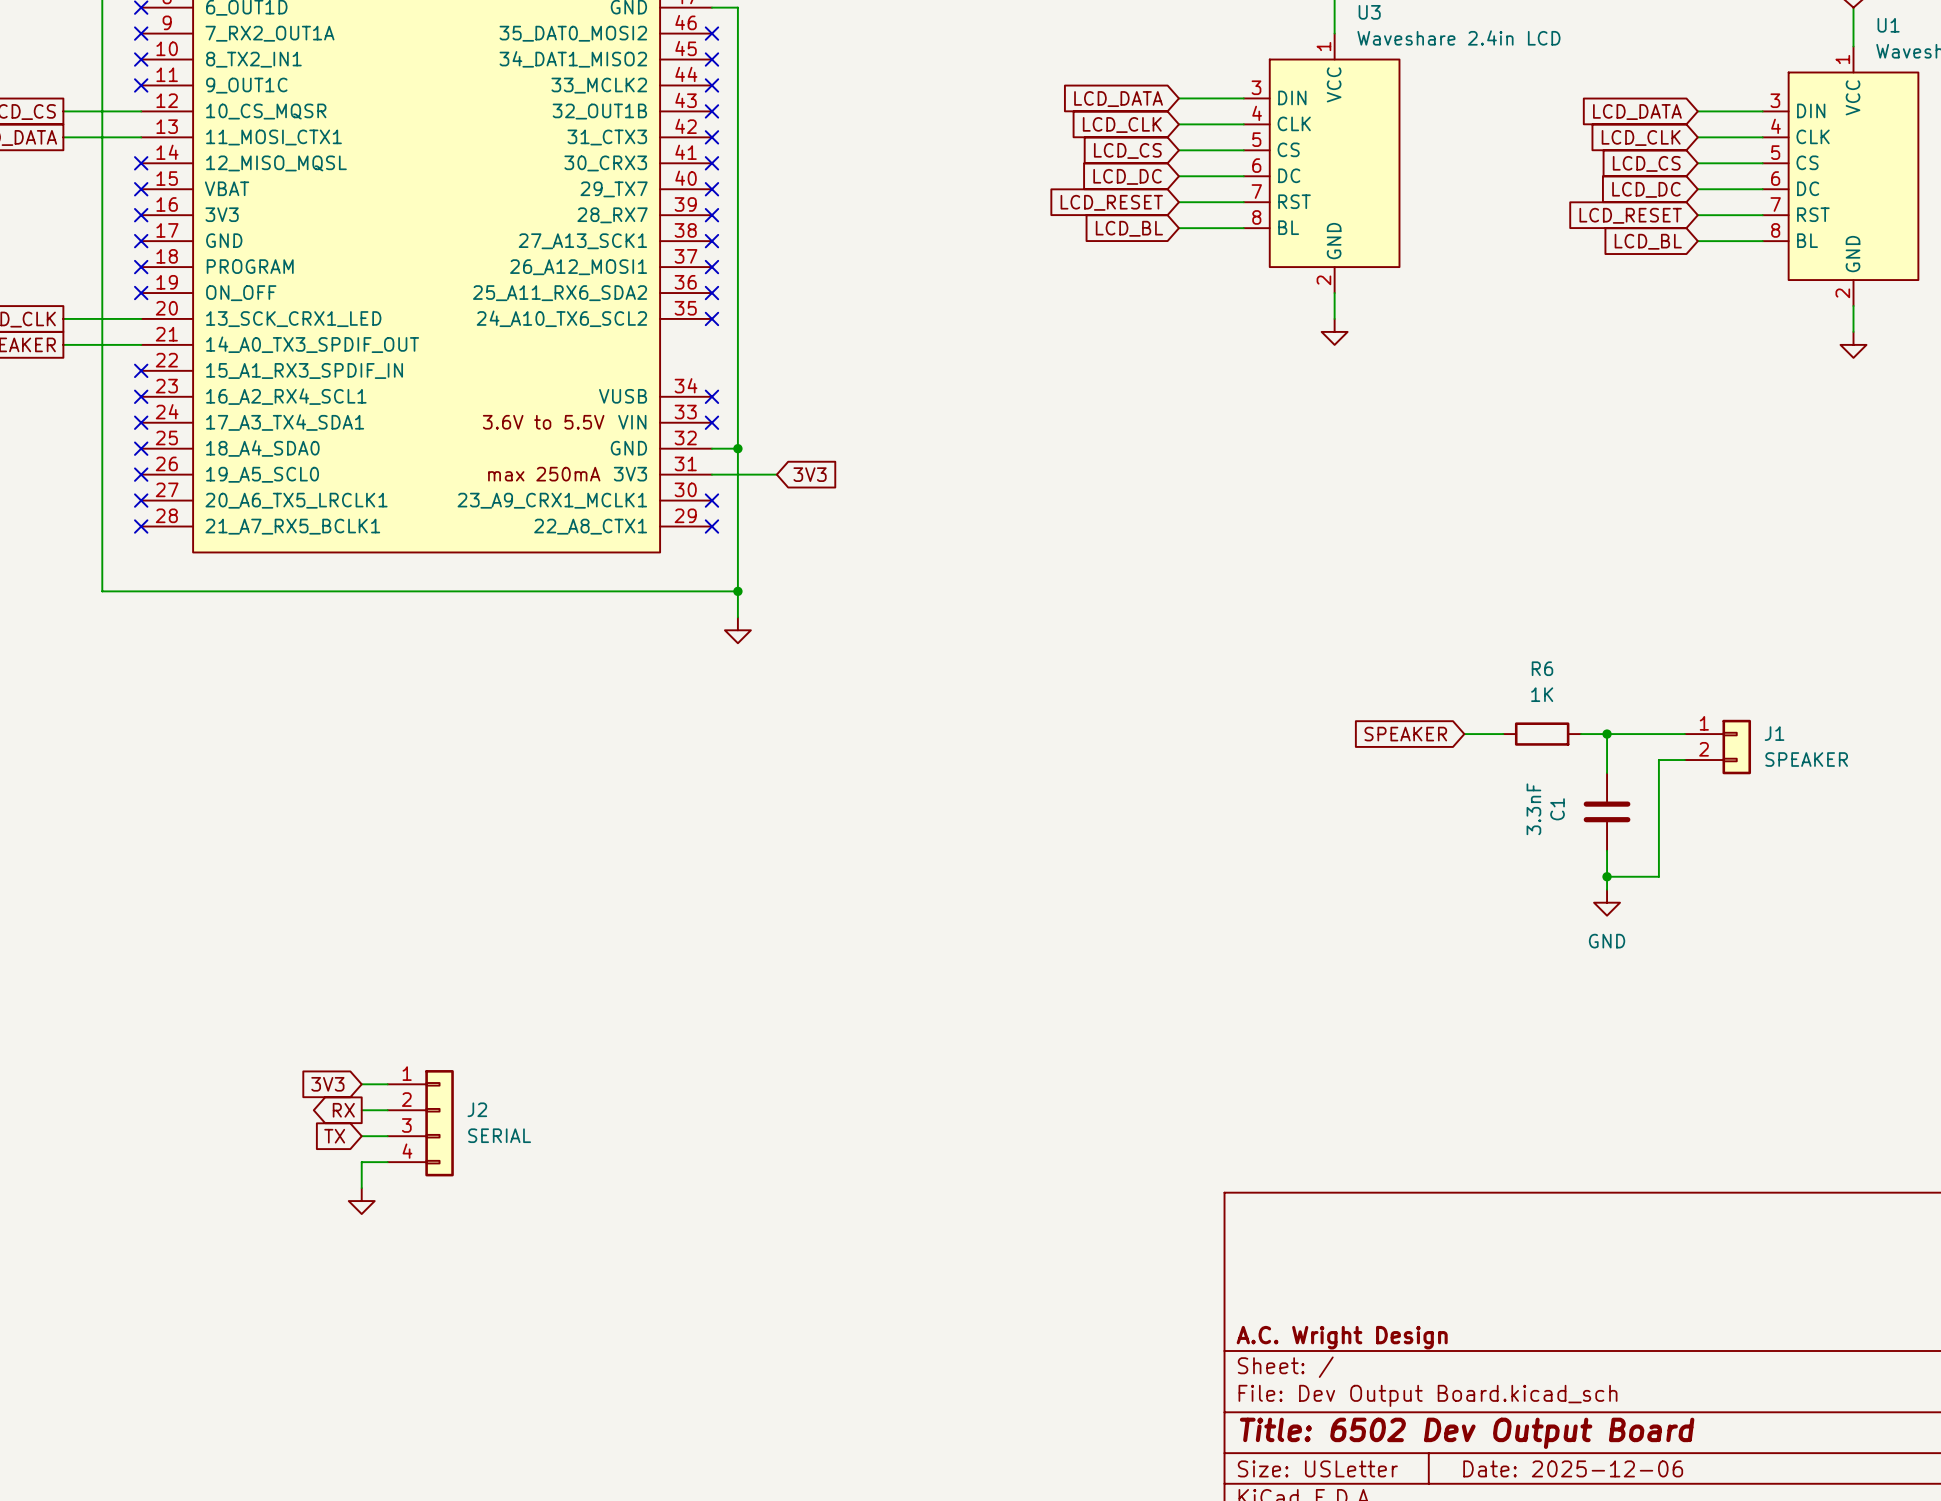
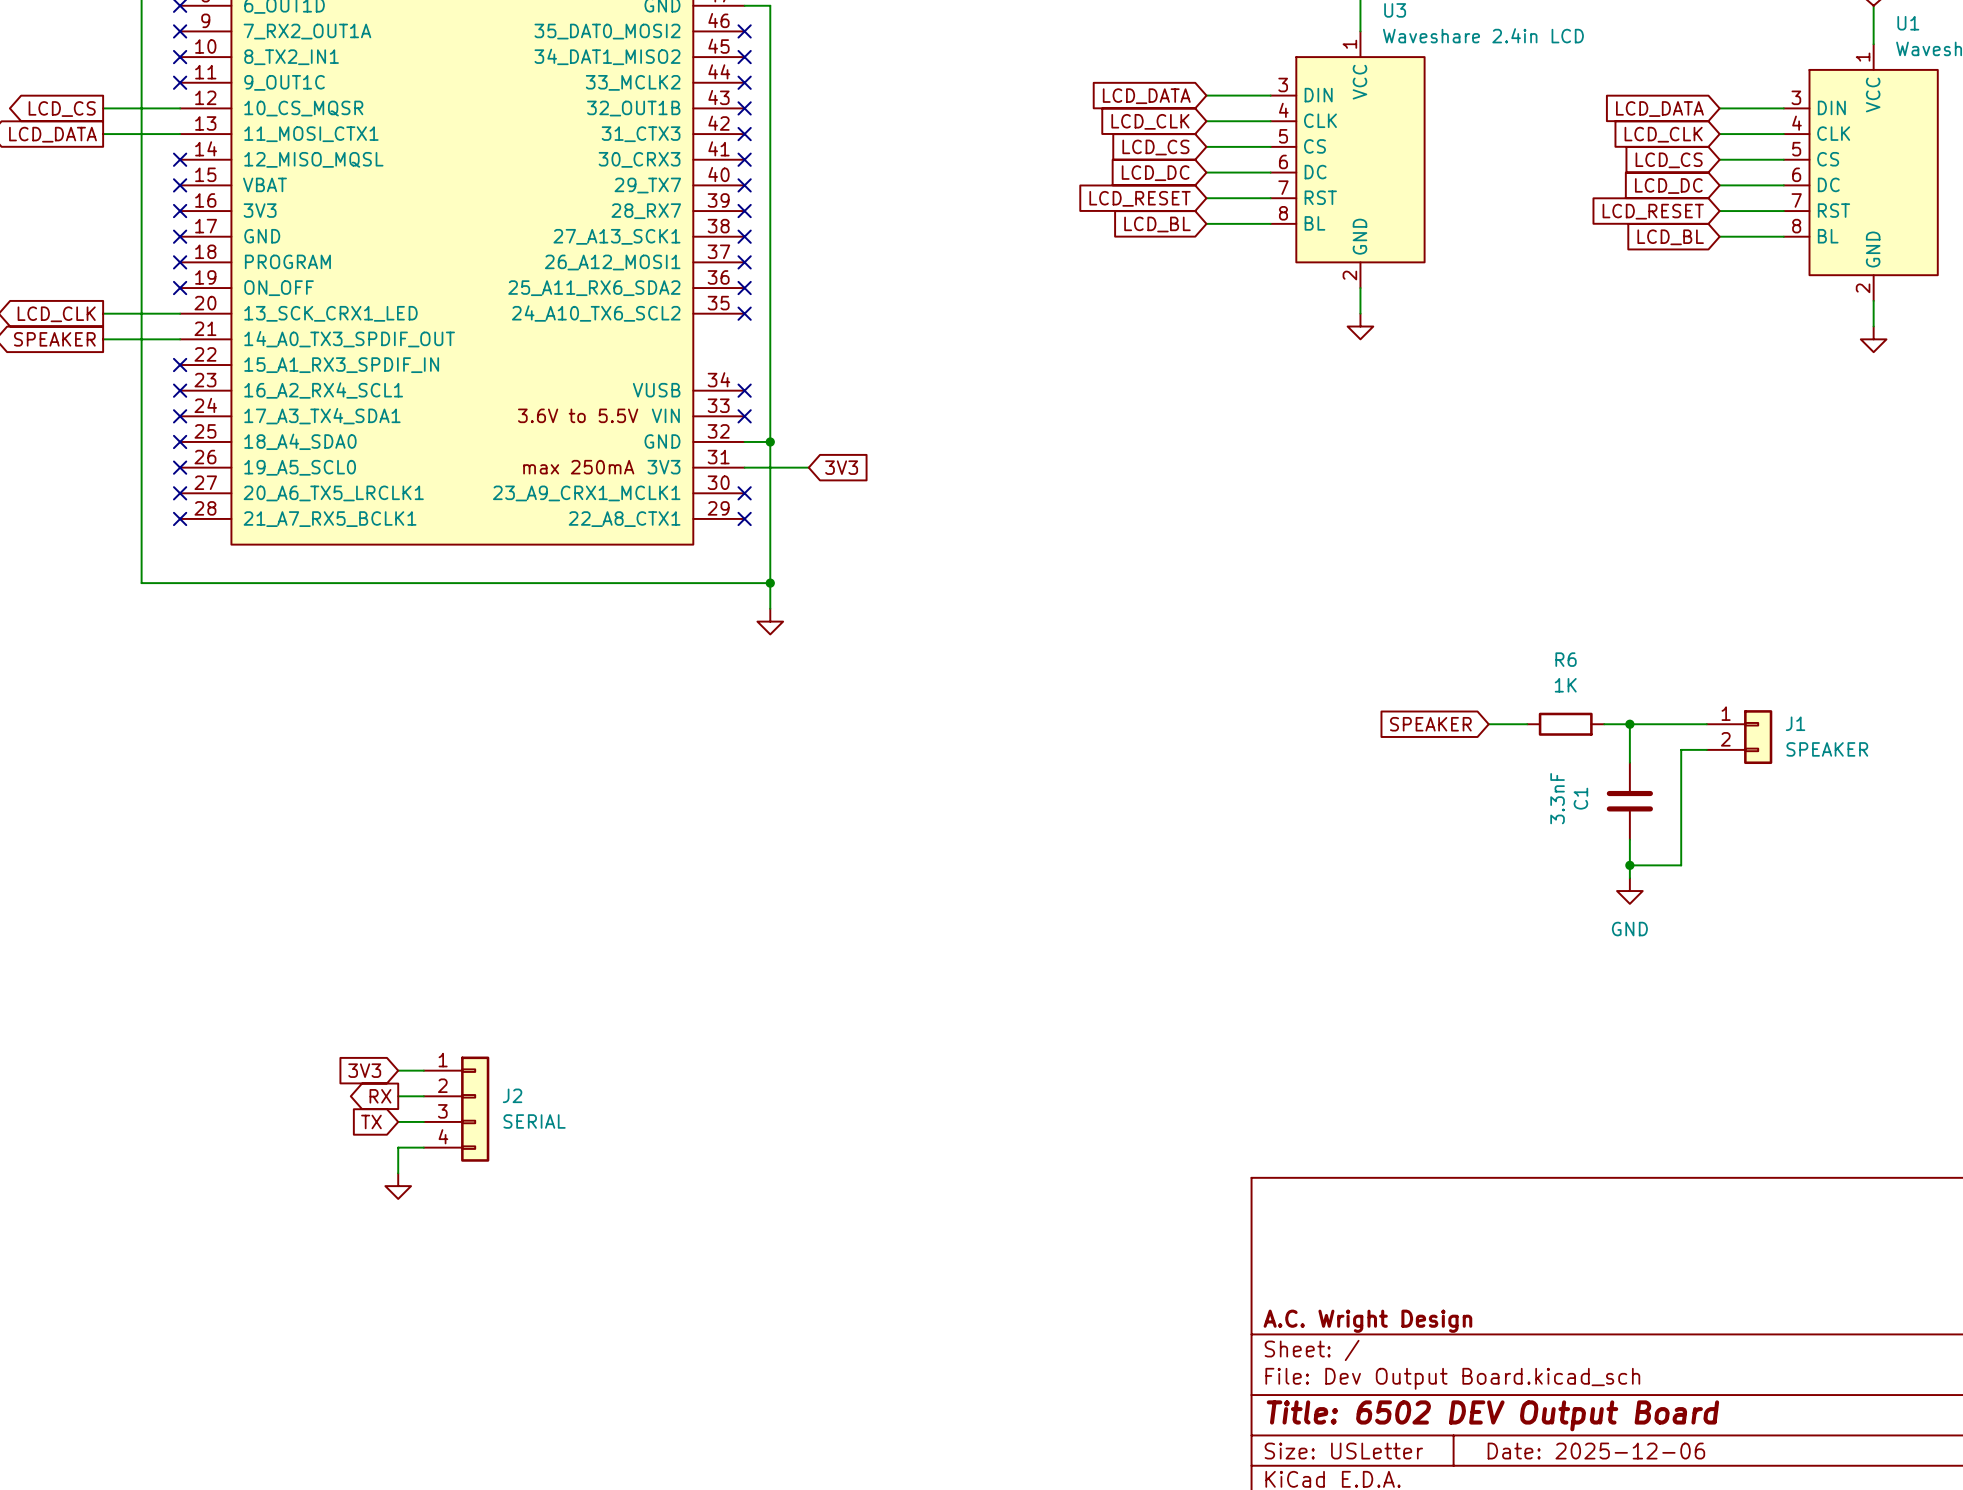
title block: Title: 6502 Dev Output Board (1467, 1433) -> Title: 6502 DEV Output Board (1492, 1415)

